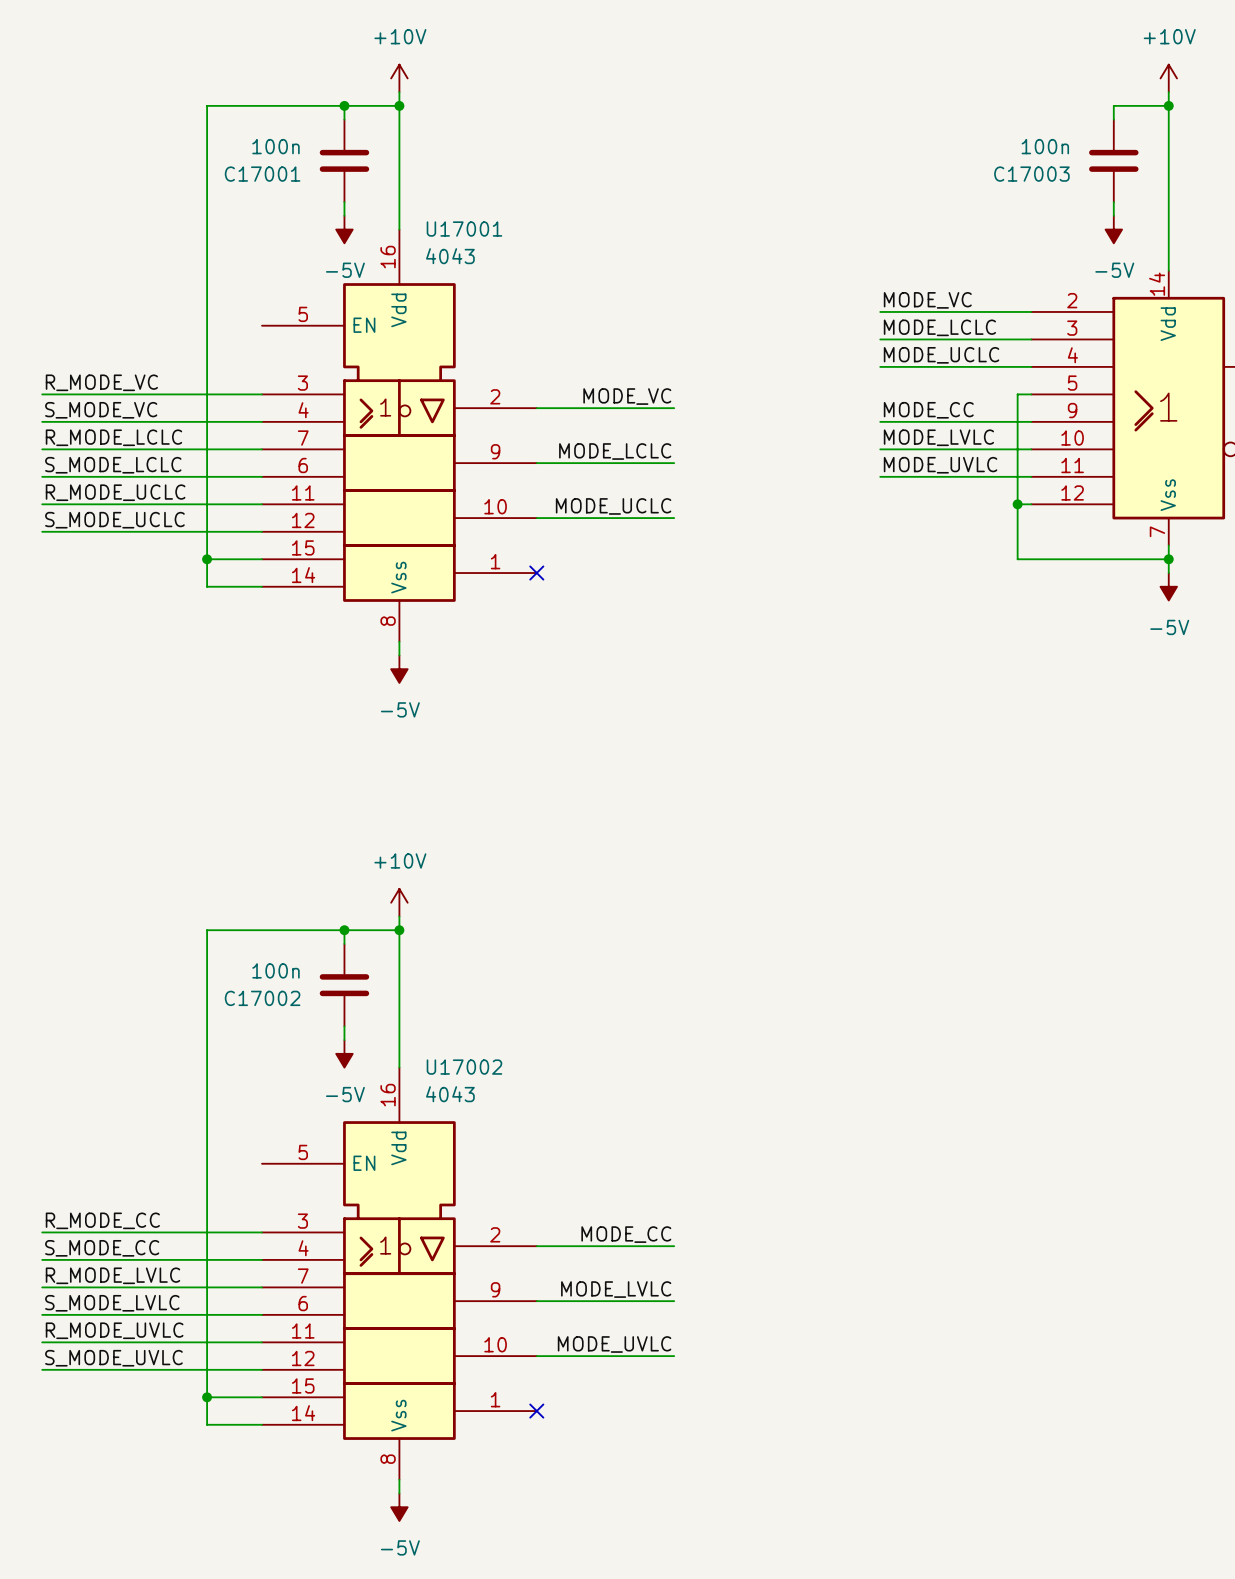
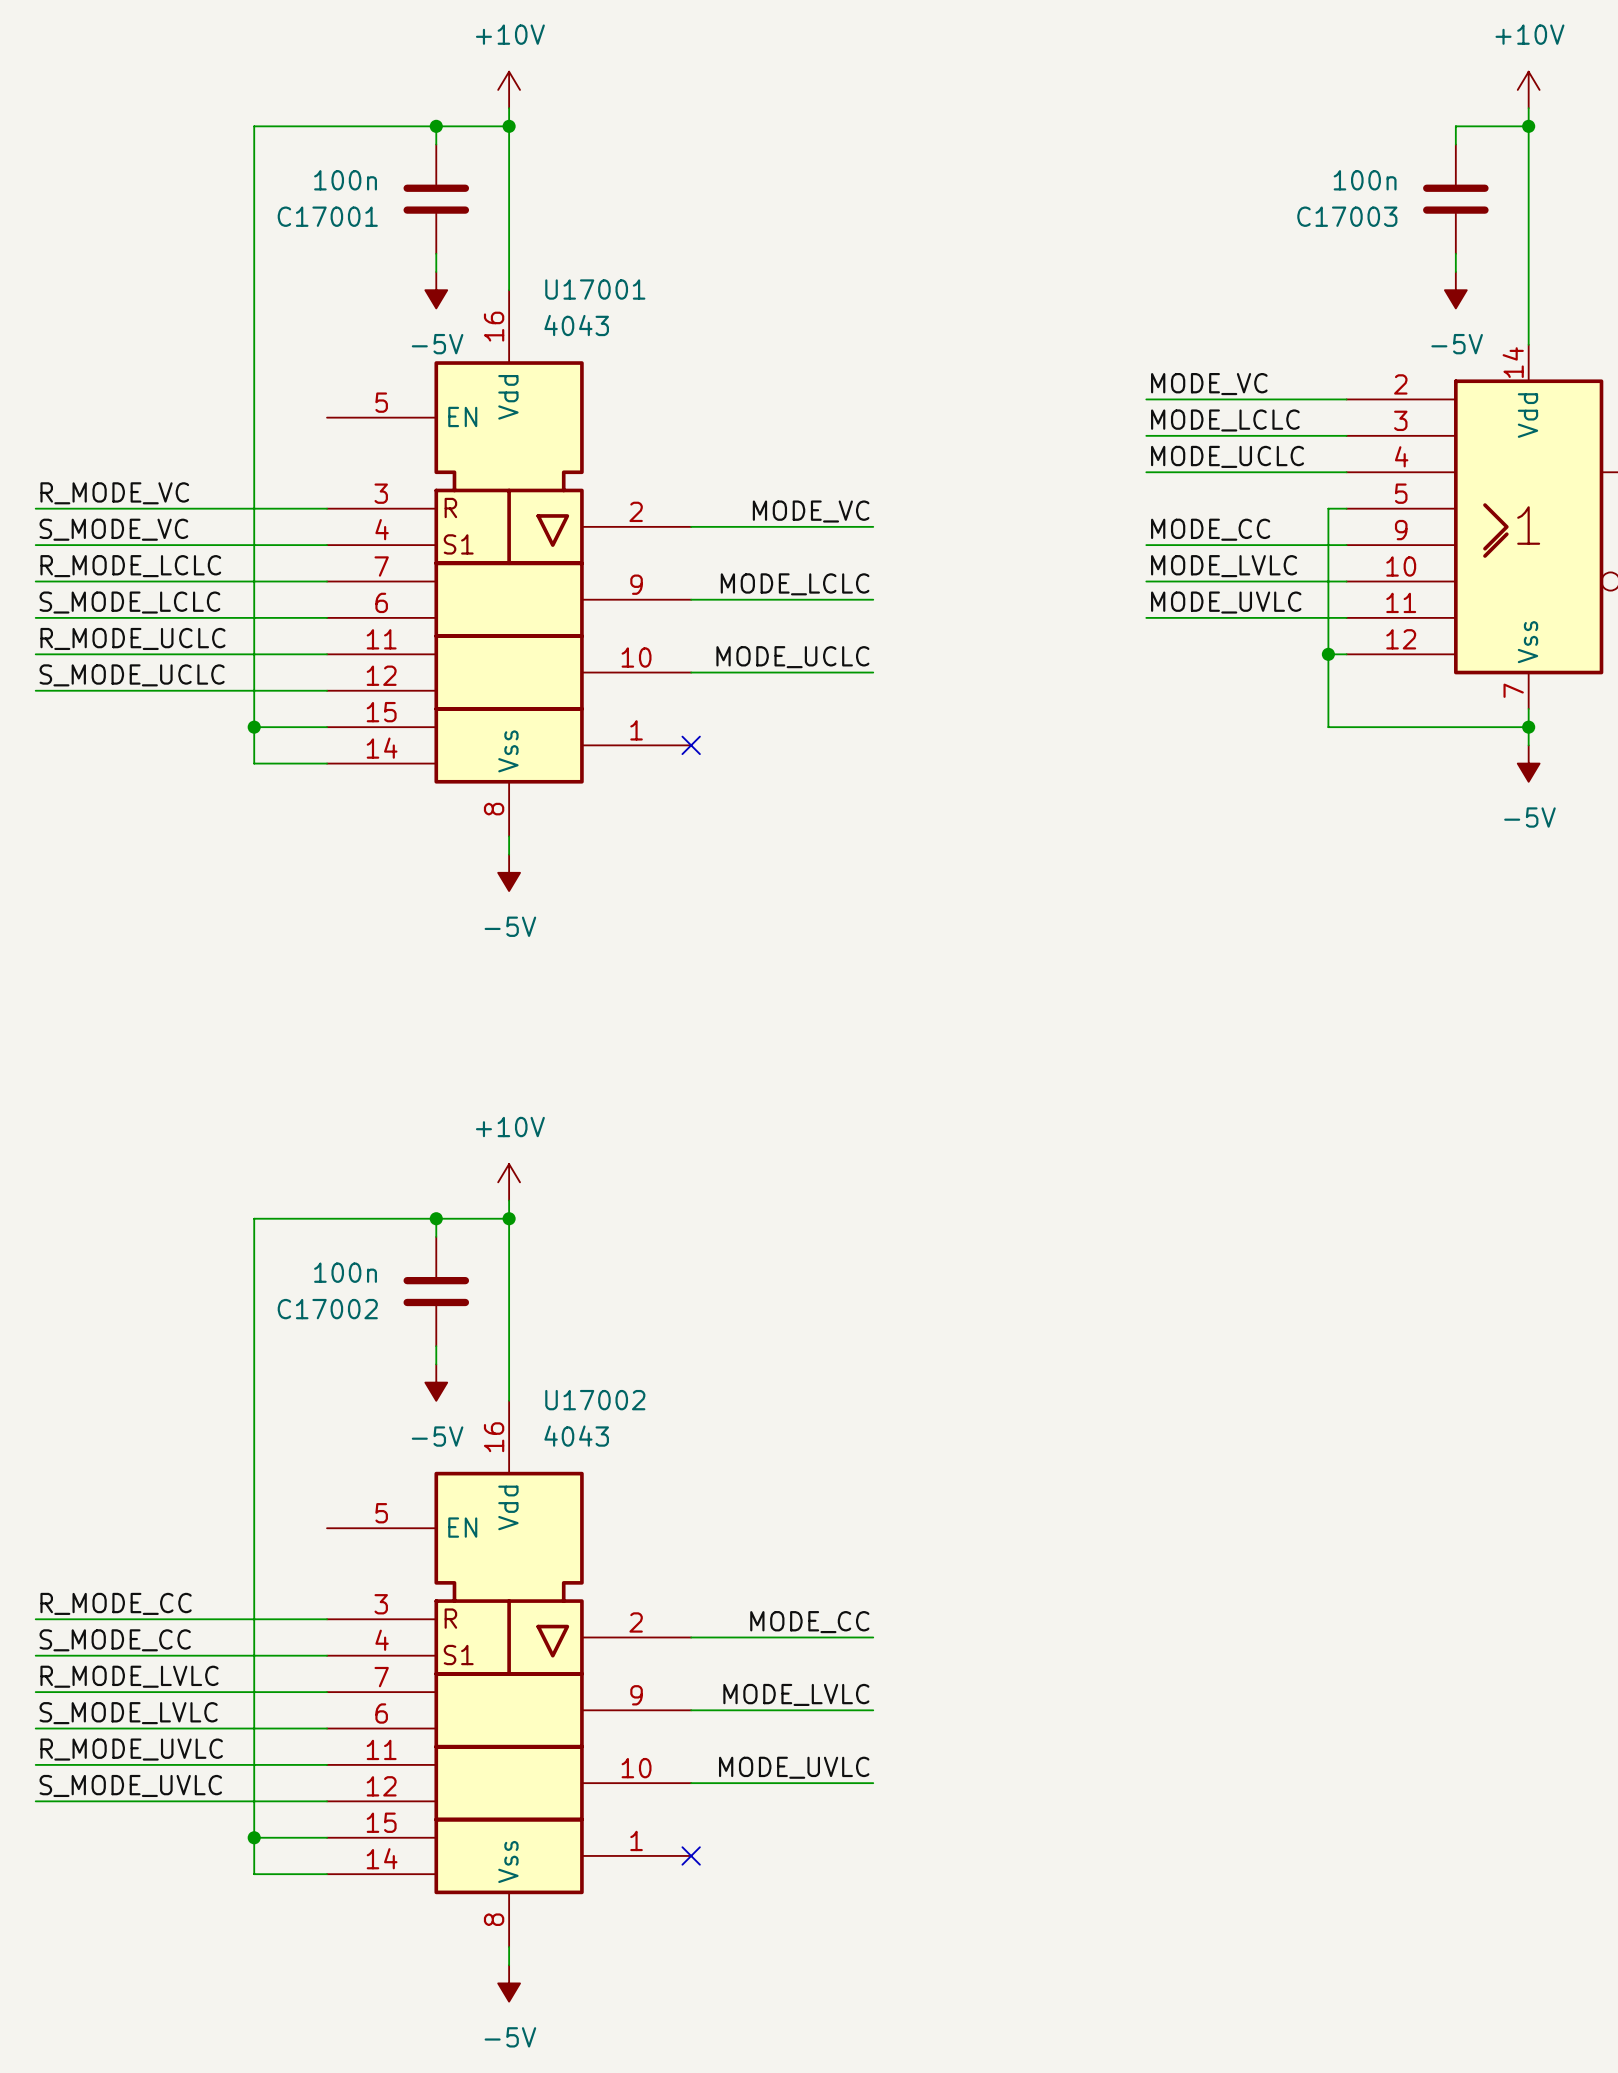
U17001 symbol: [262, 229, 537, 642] -> [327, 290, 692, 837]
U17002 symbol: [262, 1067, 537, 1480] -> [327, 1400, 692, 1948]

